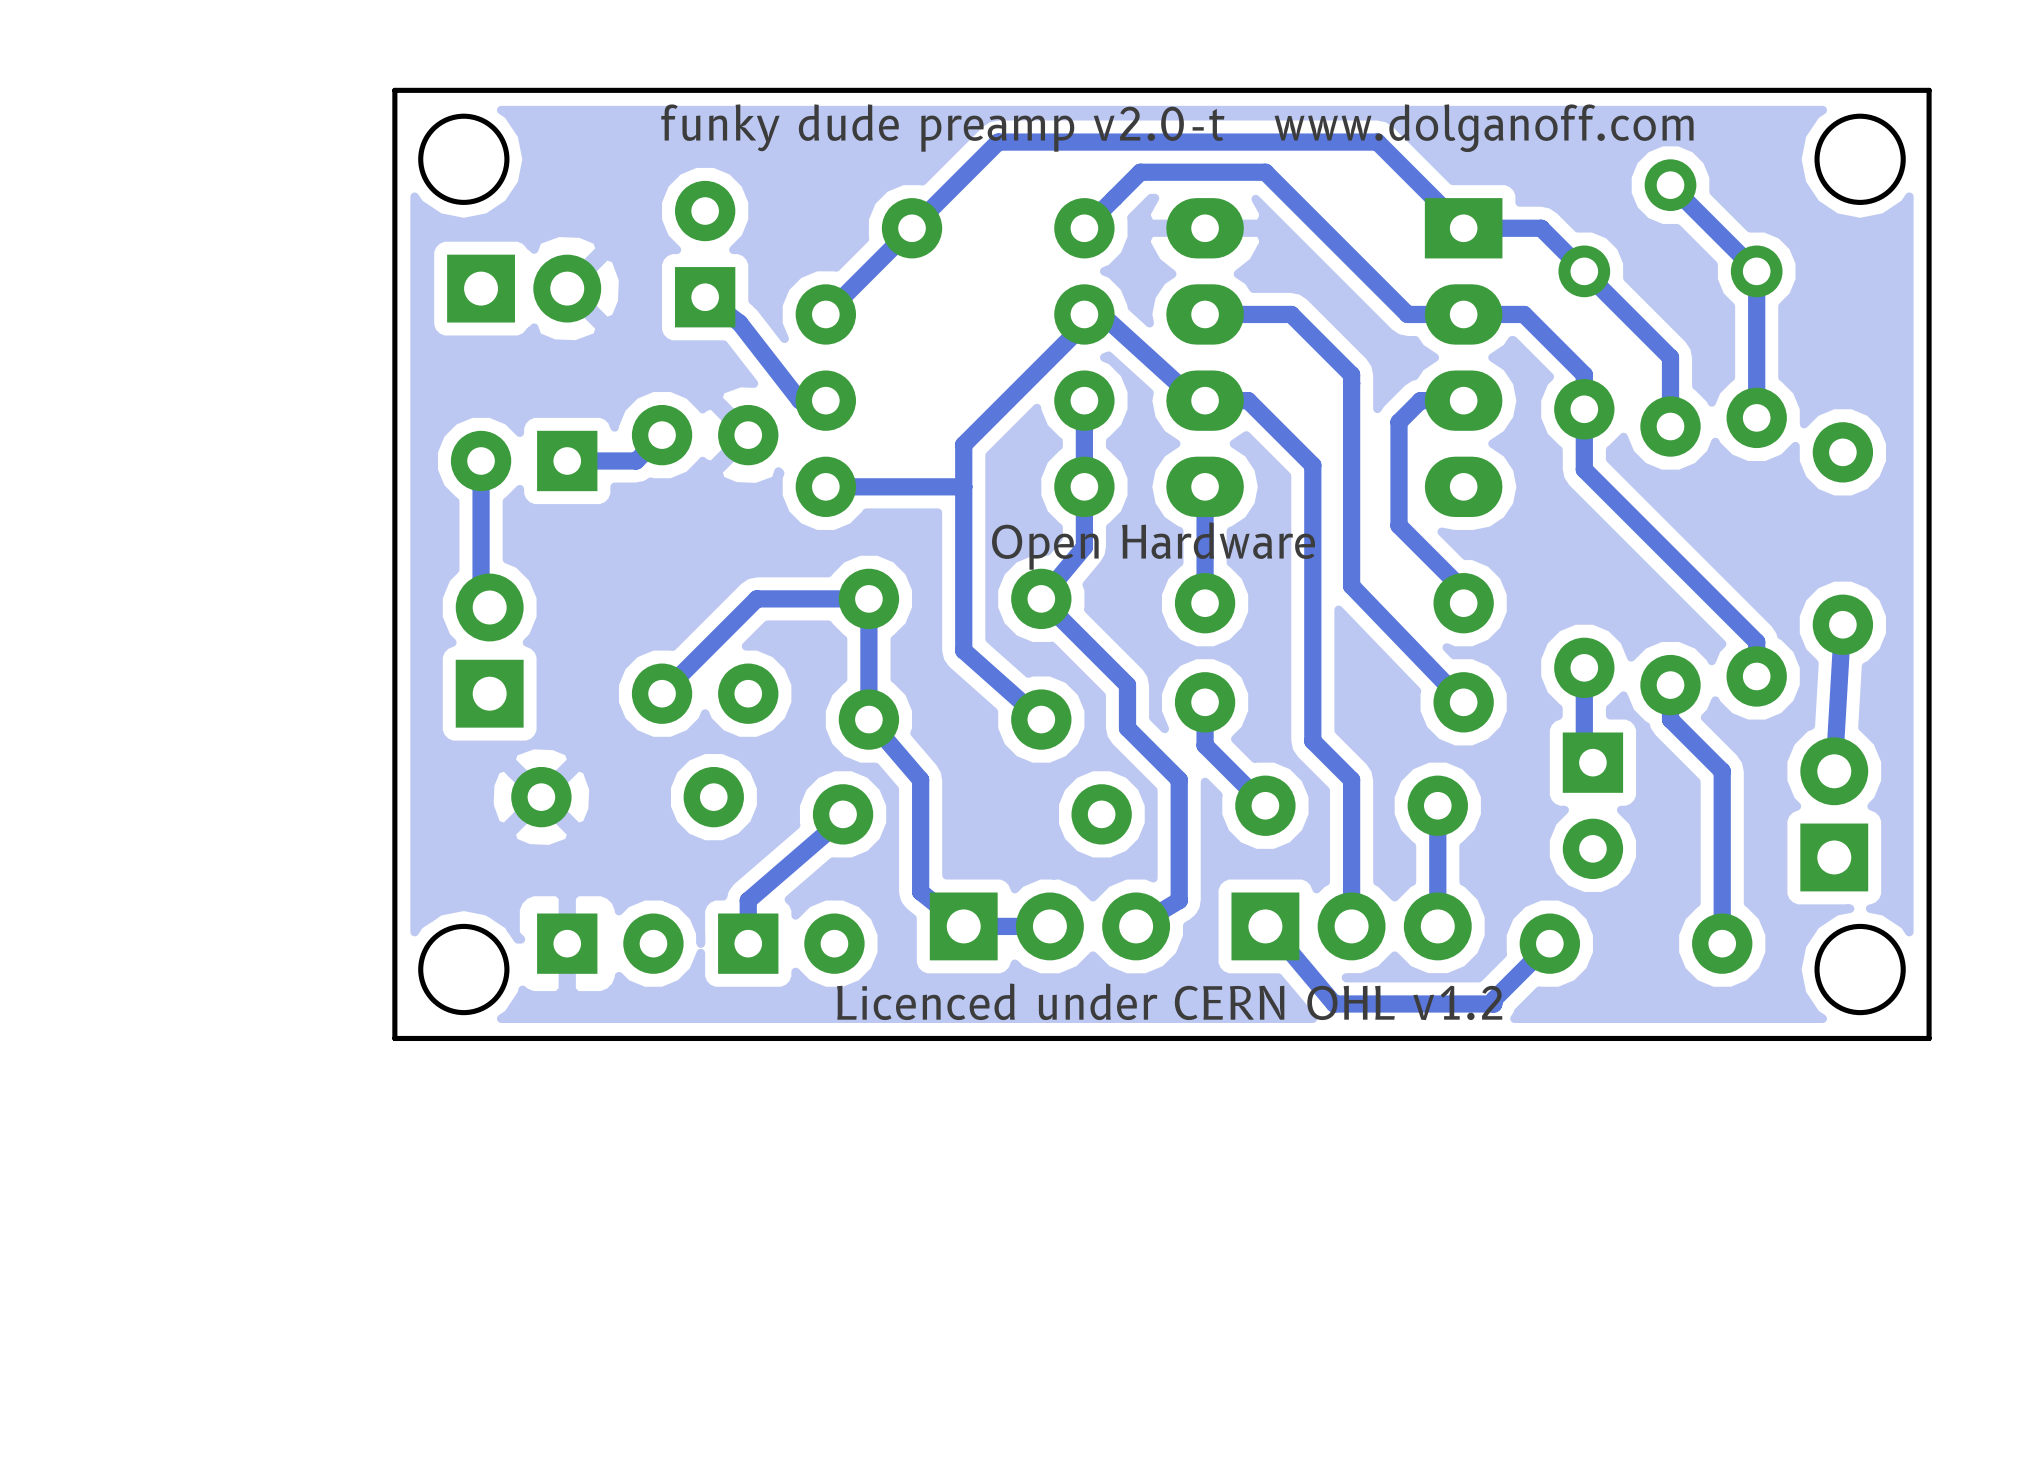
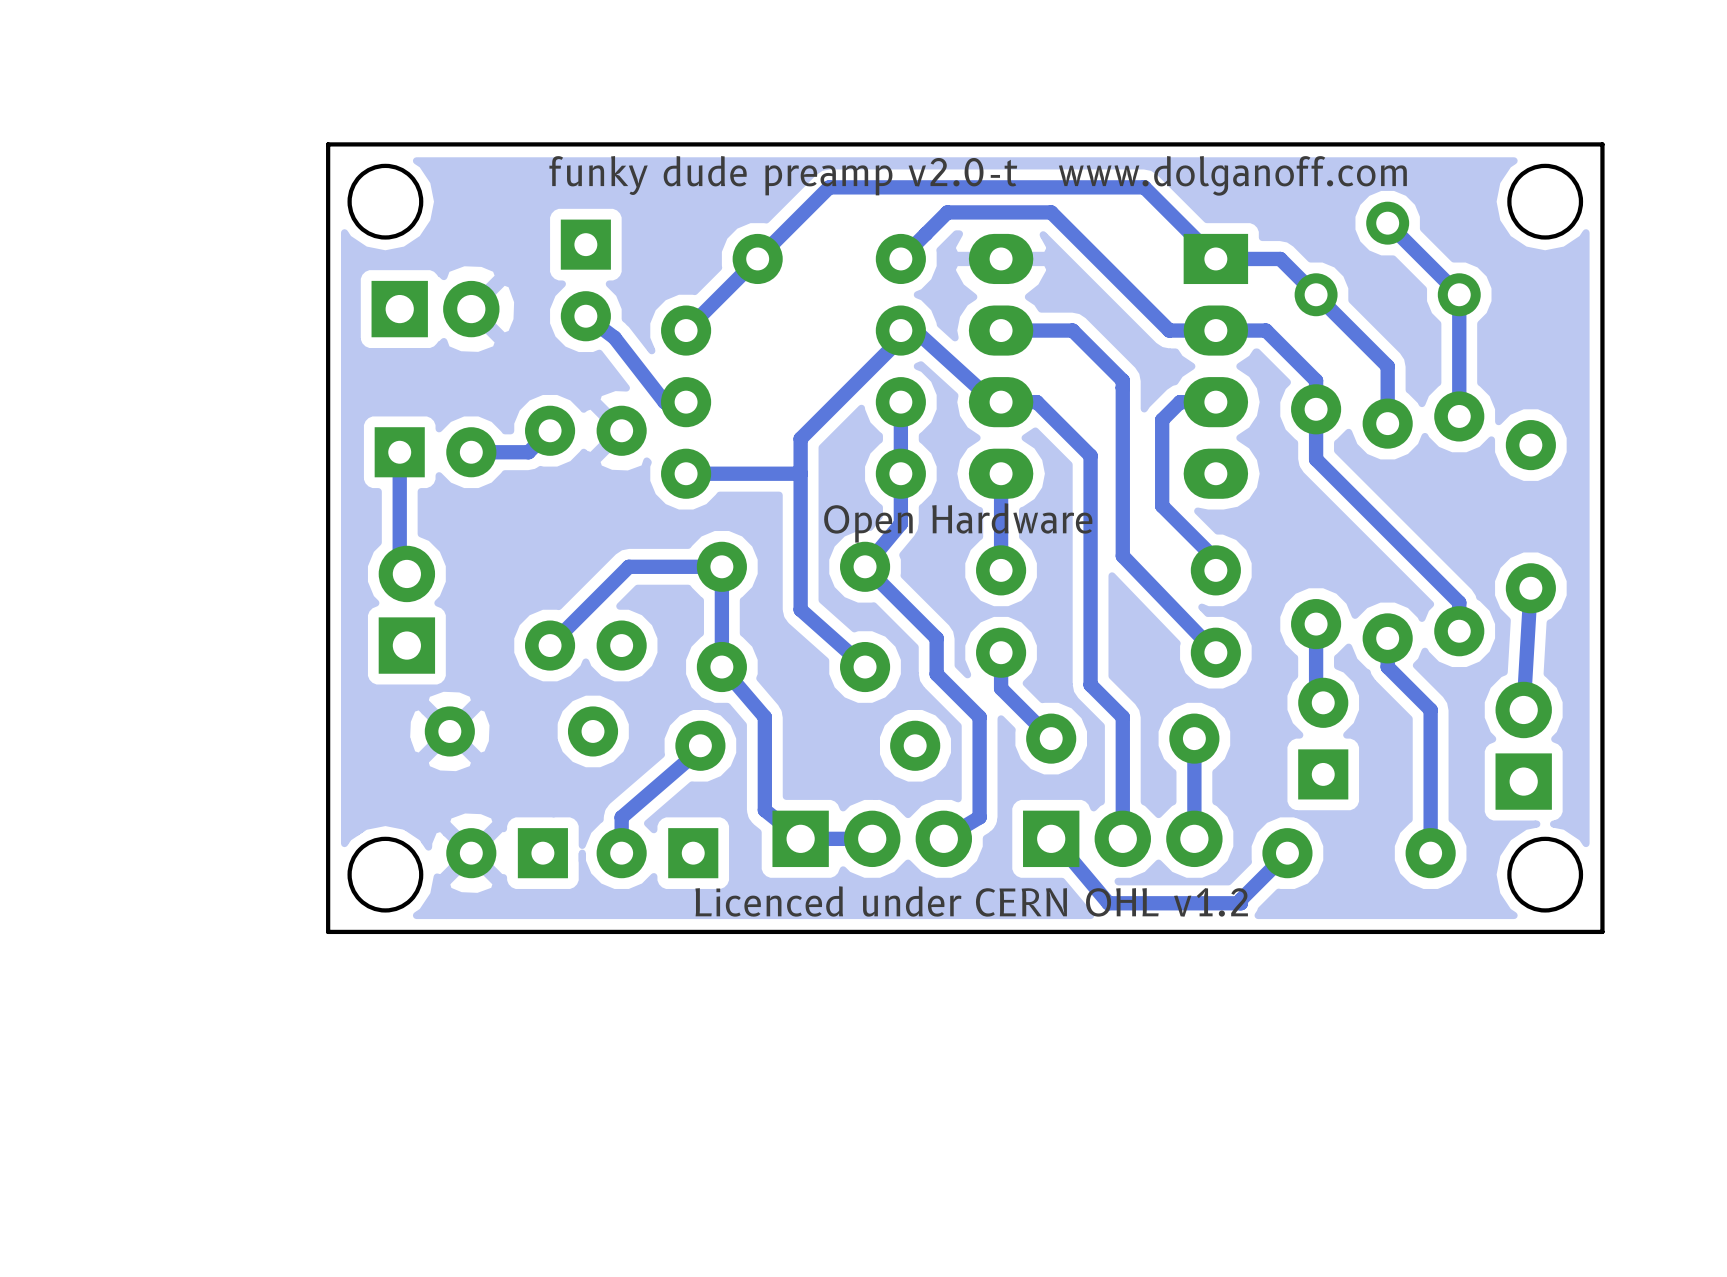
part rotation: 0° (705, 254) -> 180° (585, 280)
part rotation: 0° (524, 460) -> 180° (435, 452)
part rotation: 0° (1592, 805) -> 180° (1323, 738)
part rotation: 0° (610, 943) -> 180° (507, 853)
part rotation: 0° (791, 943) -> 180° (657, 853)

